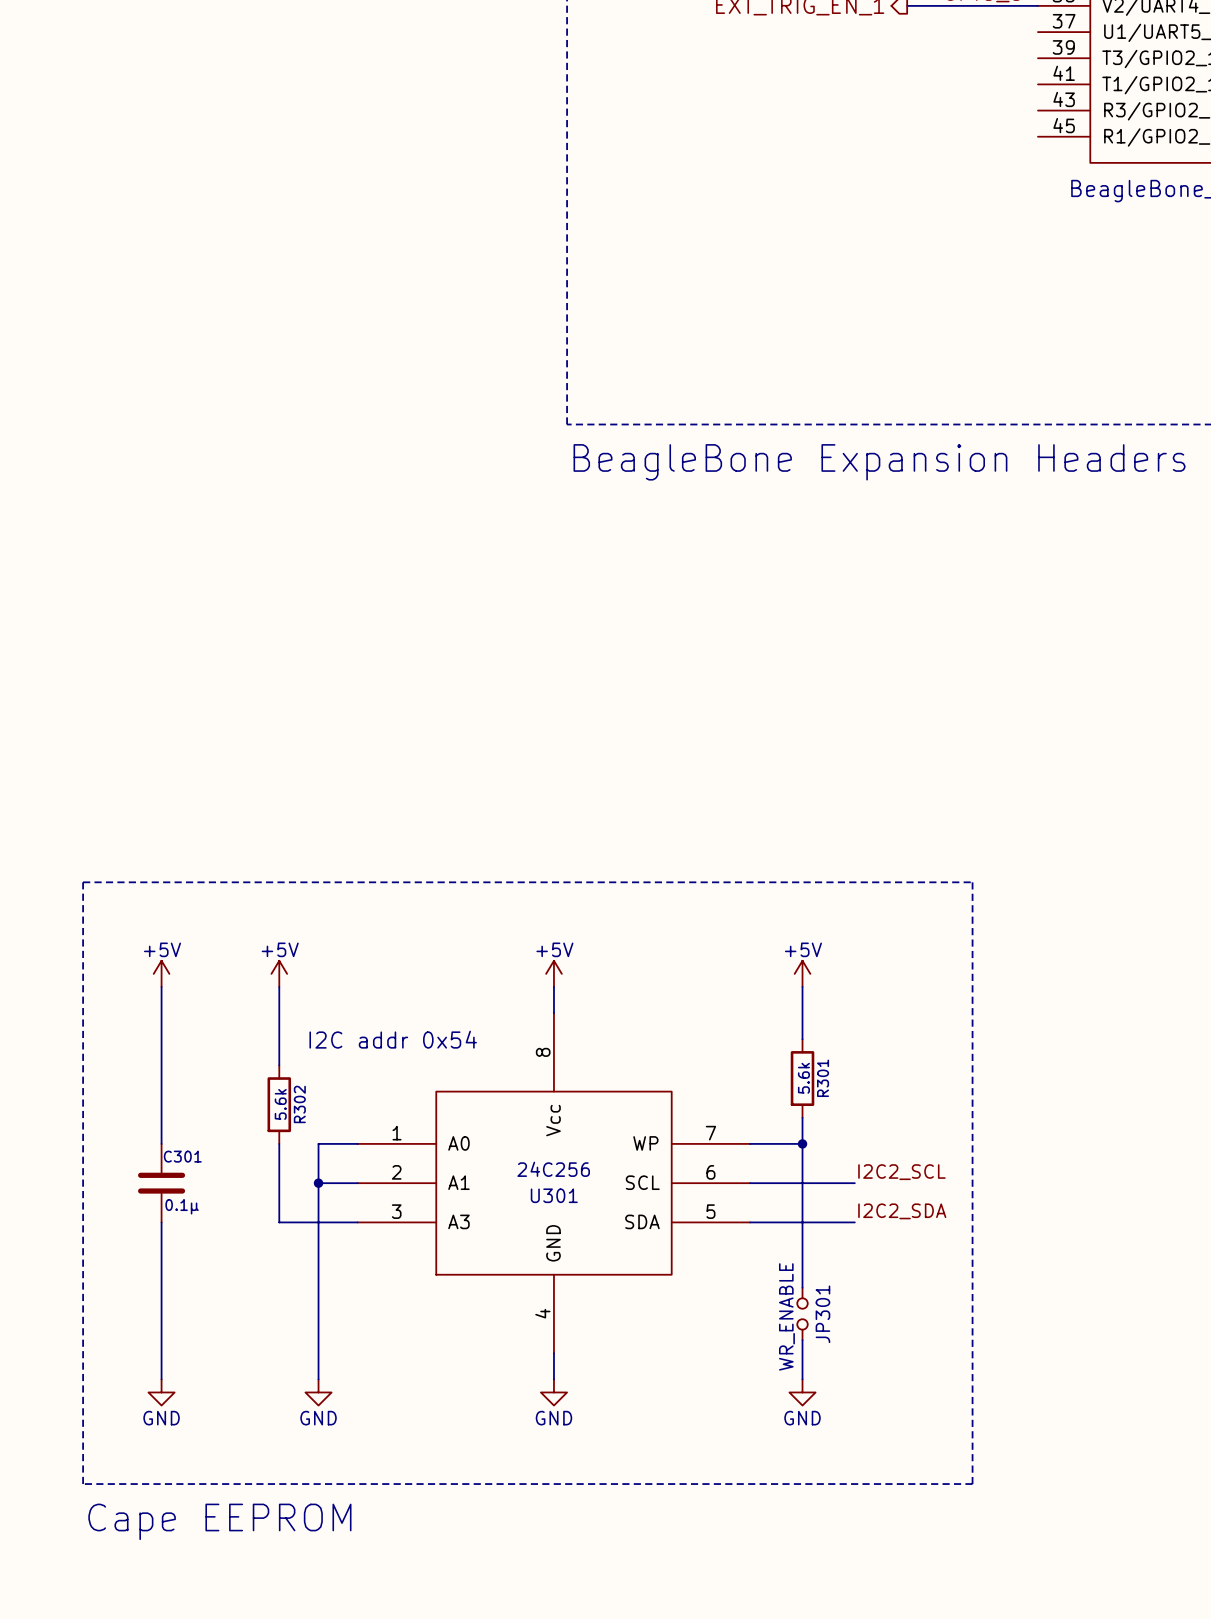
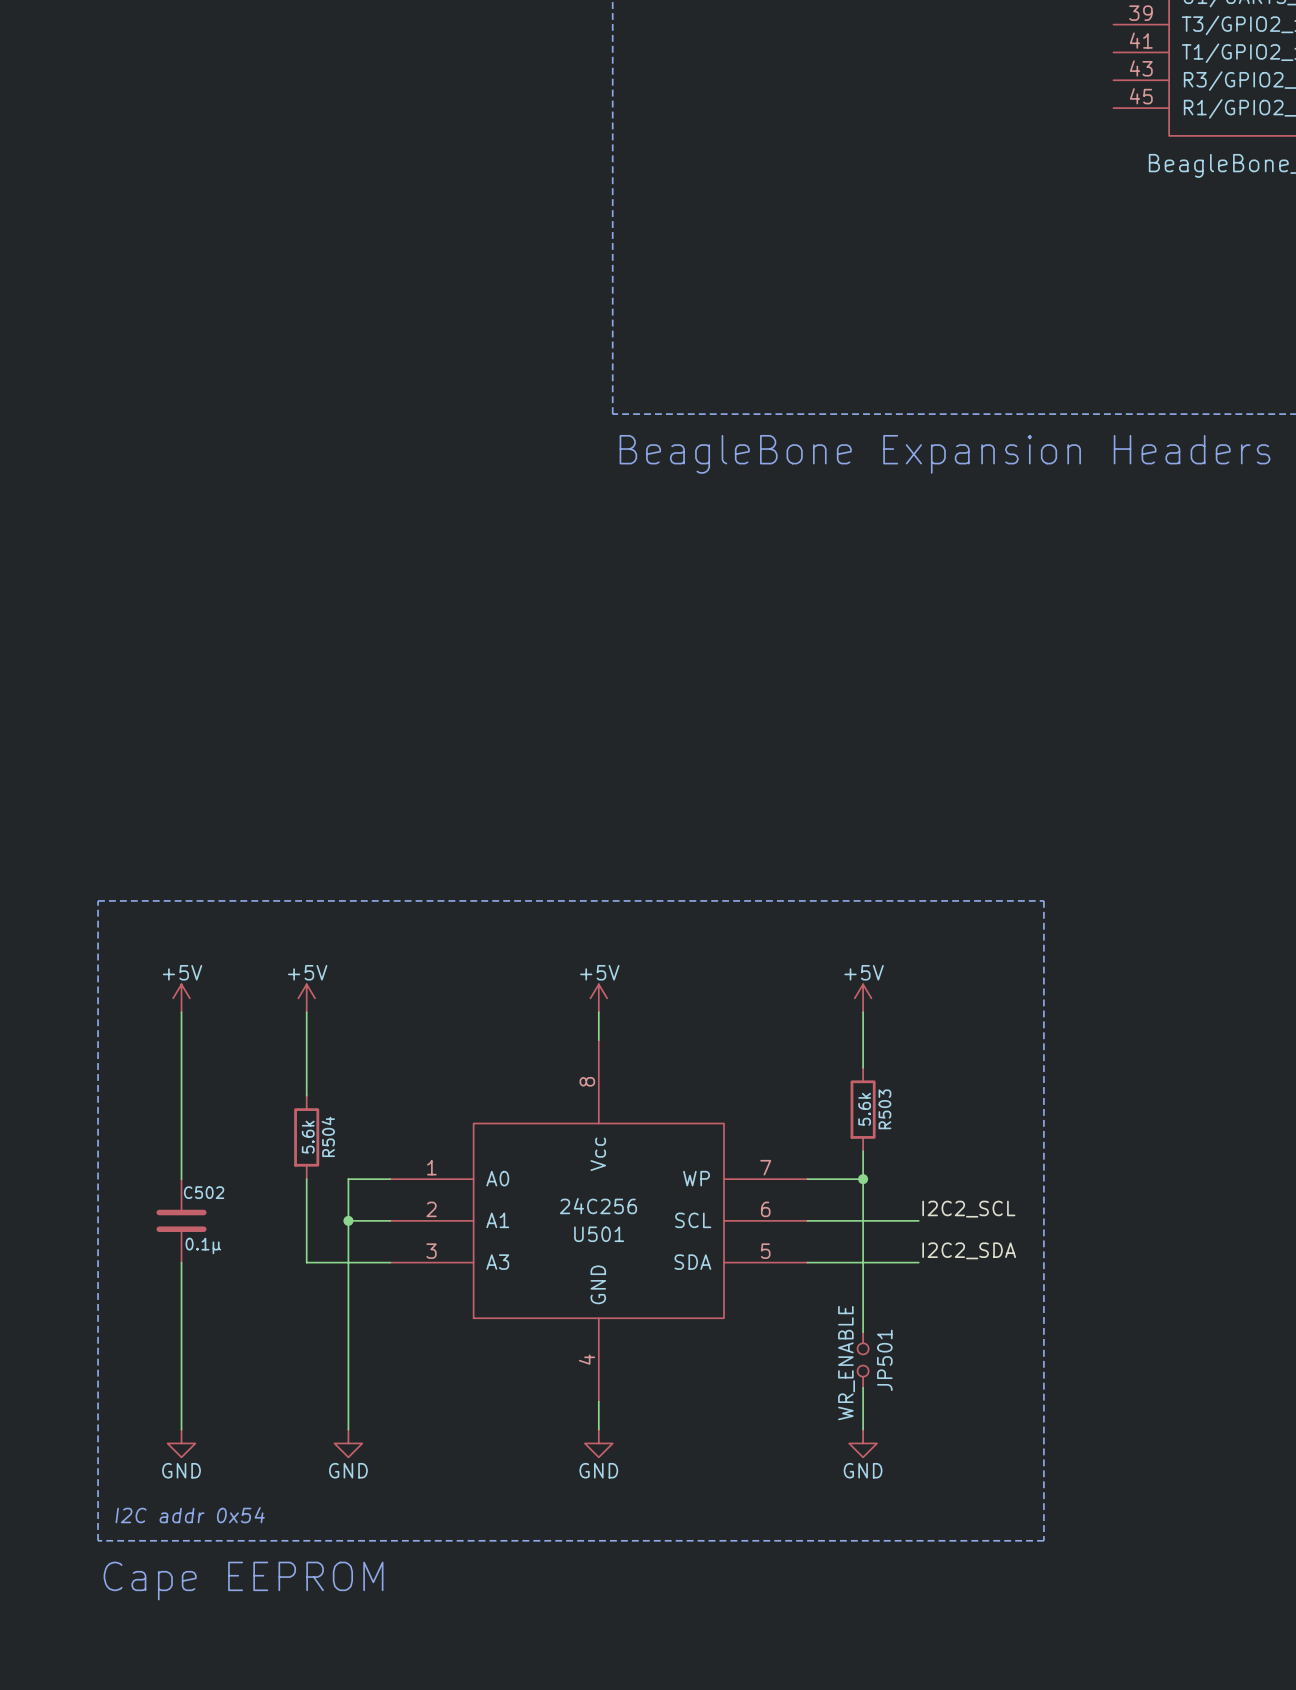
text: I2C addr 0x54 (393, 1039) -> none
R301 name: R301 (823, 1078) -> R503 (884, 1109)
R302 name: R302 (299, 1104) -> R504 (328, 1136)
C301 name: C301 (182, 1156) -> C502 (204, 1192)
U301 name: U301 (554, 1195) -> U501 (599, 1234)
JP301 name: JP301 (822, 1314) -> JP501 (884, 1360)
text: none -> I2C addr 0x54 (190, 1515)

